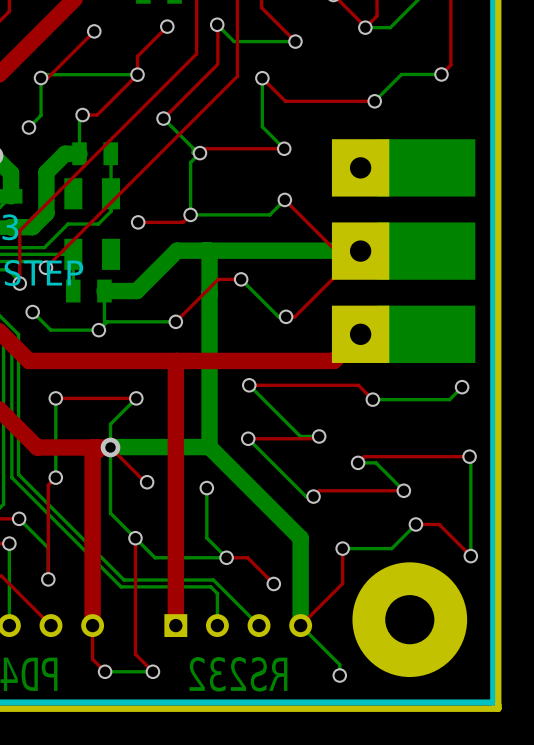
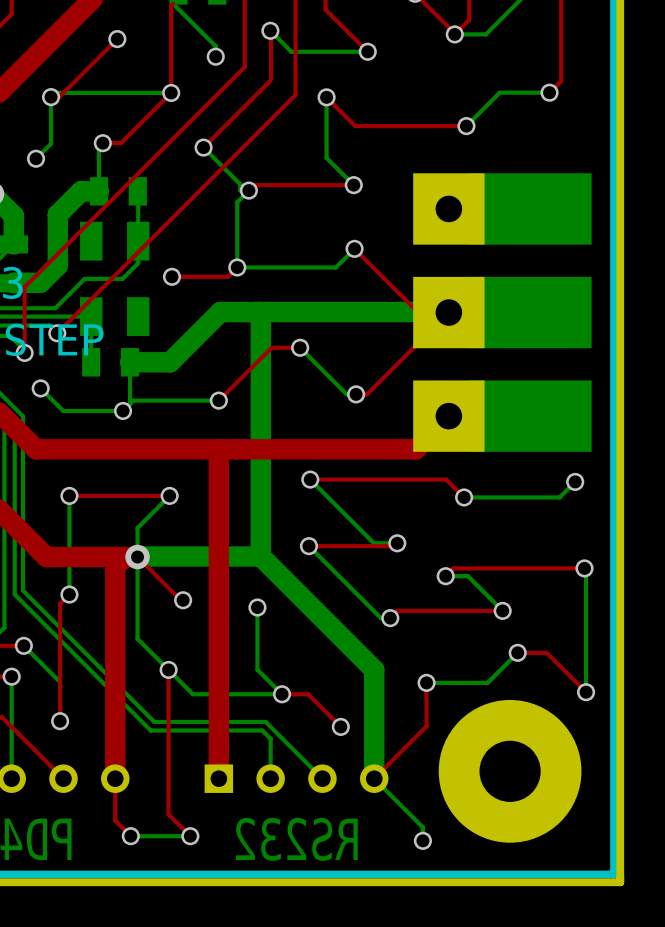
bottom track: none -> (173, 3) (215, 46) (215, 56)
top track: (167, 26) (137, 56) -> (173, 3) (171, 5) (171, 70)
via position: (167, 26) -> (215, 56)

